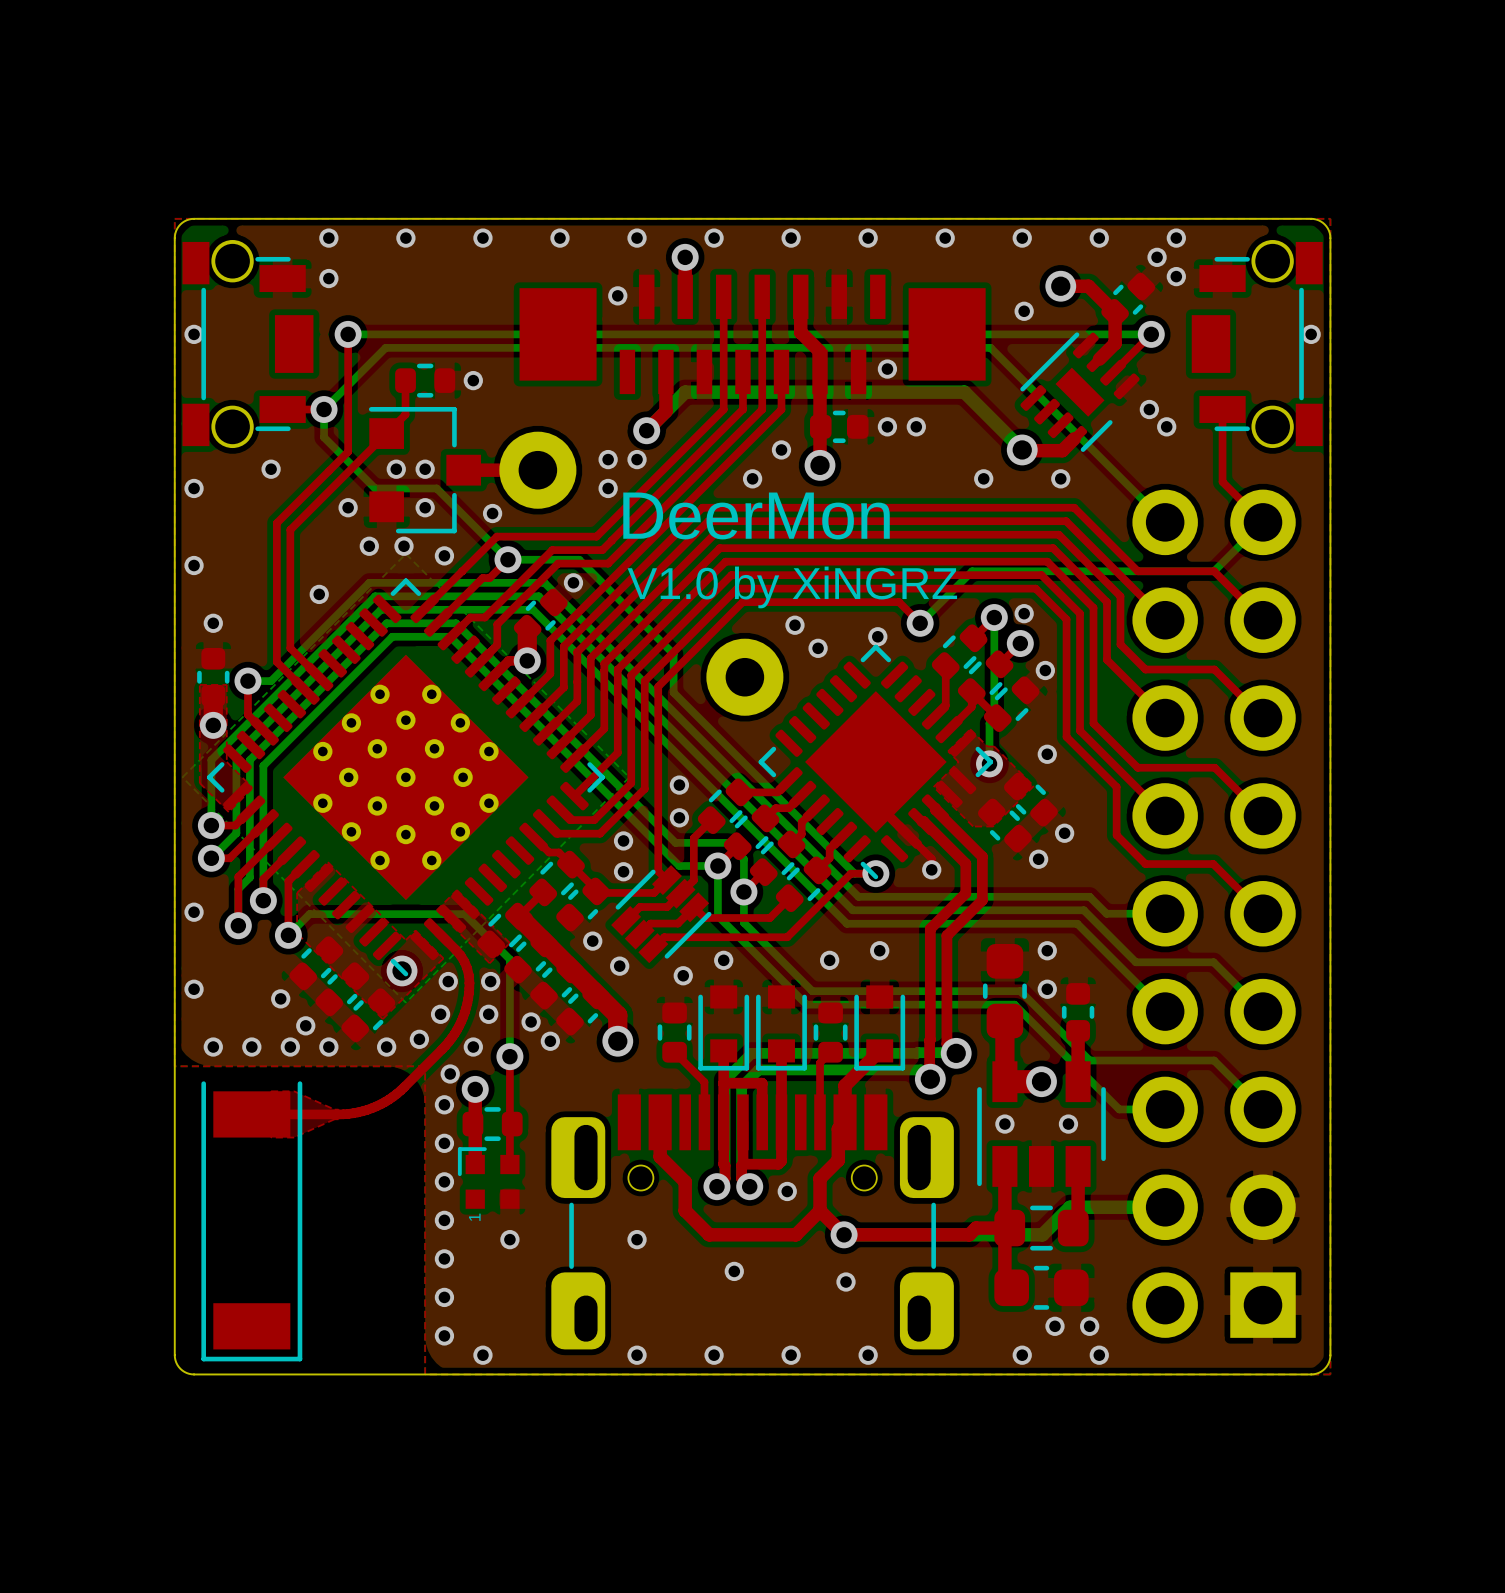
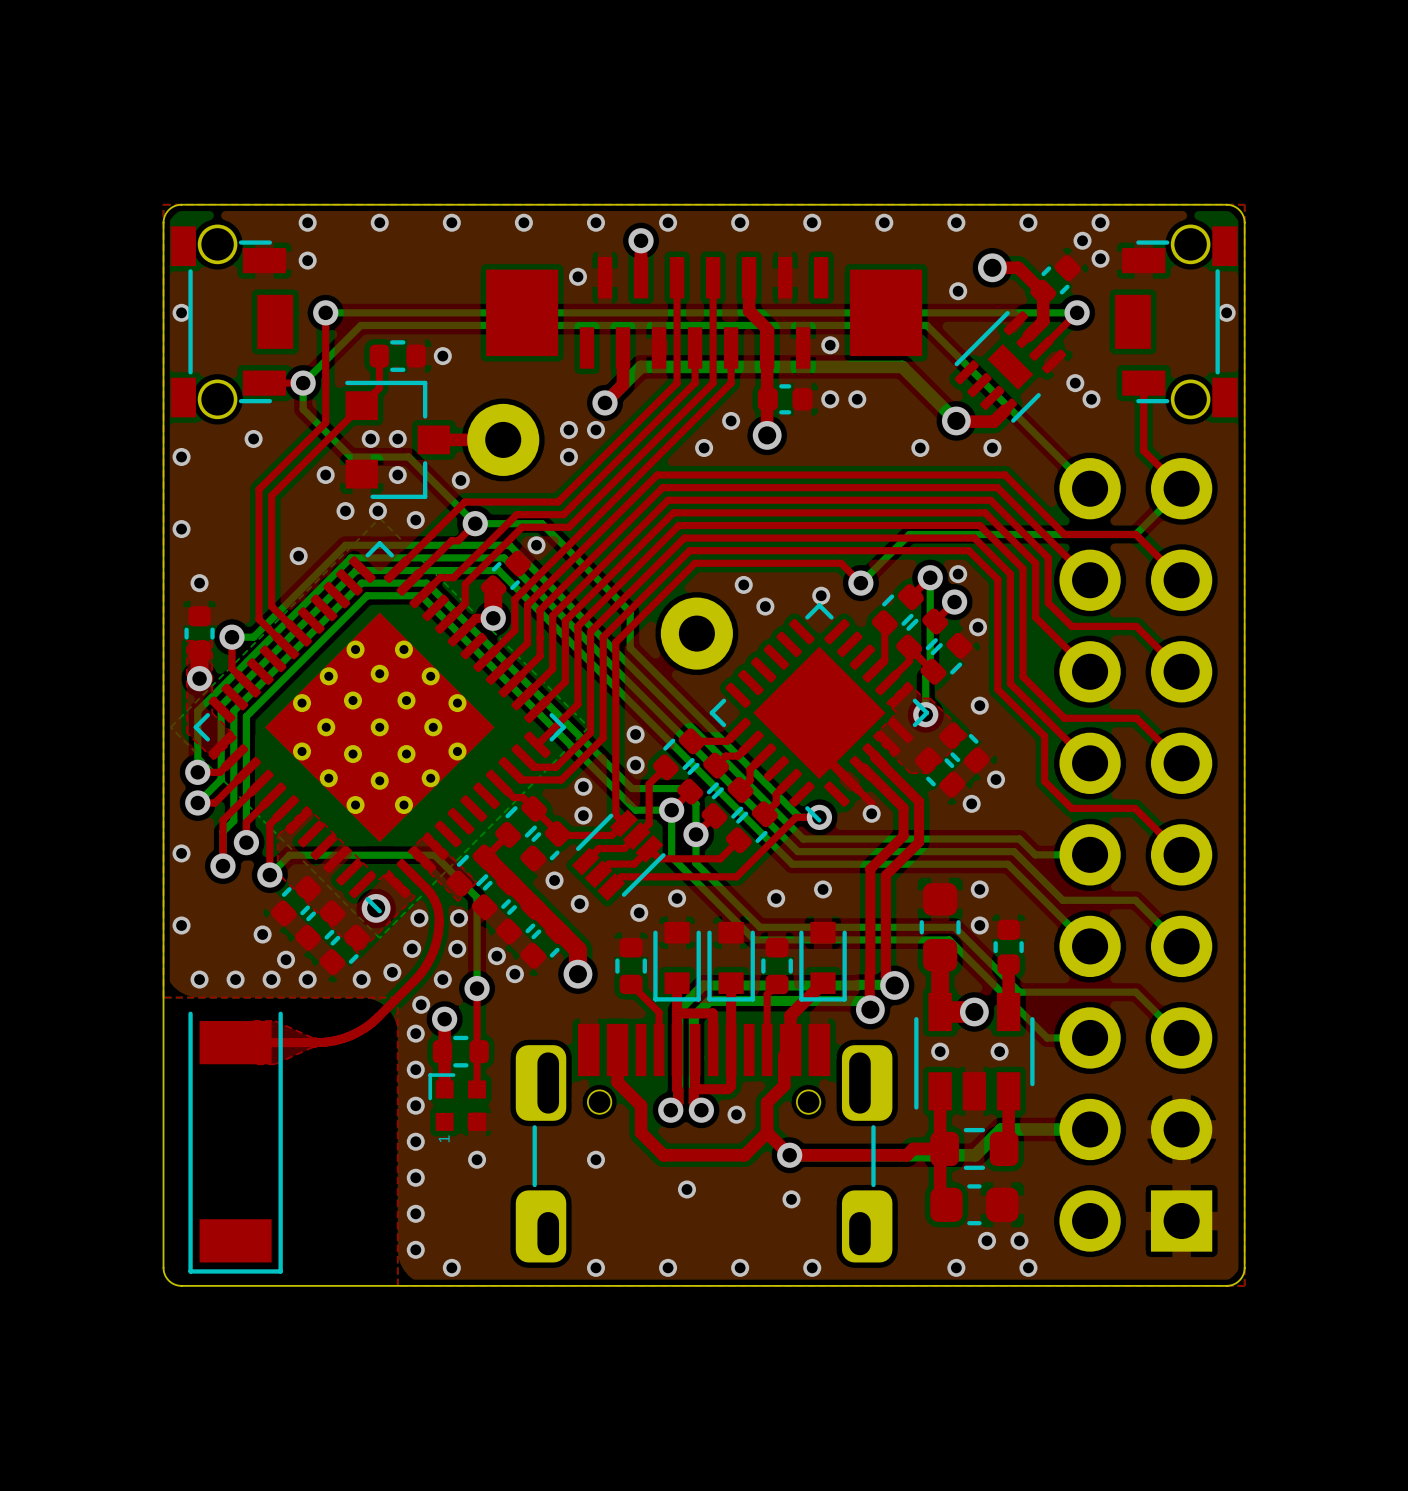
text: DeerMon (756, 515) -> none
text: V1.0 by XiNGRZ (792, 587) -> none

